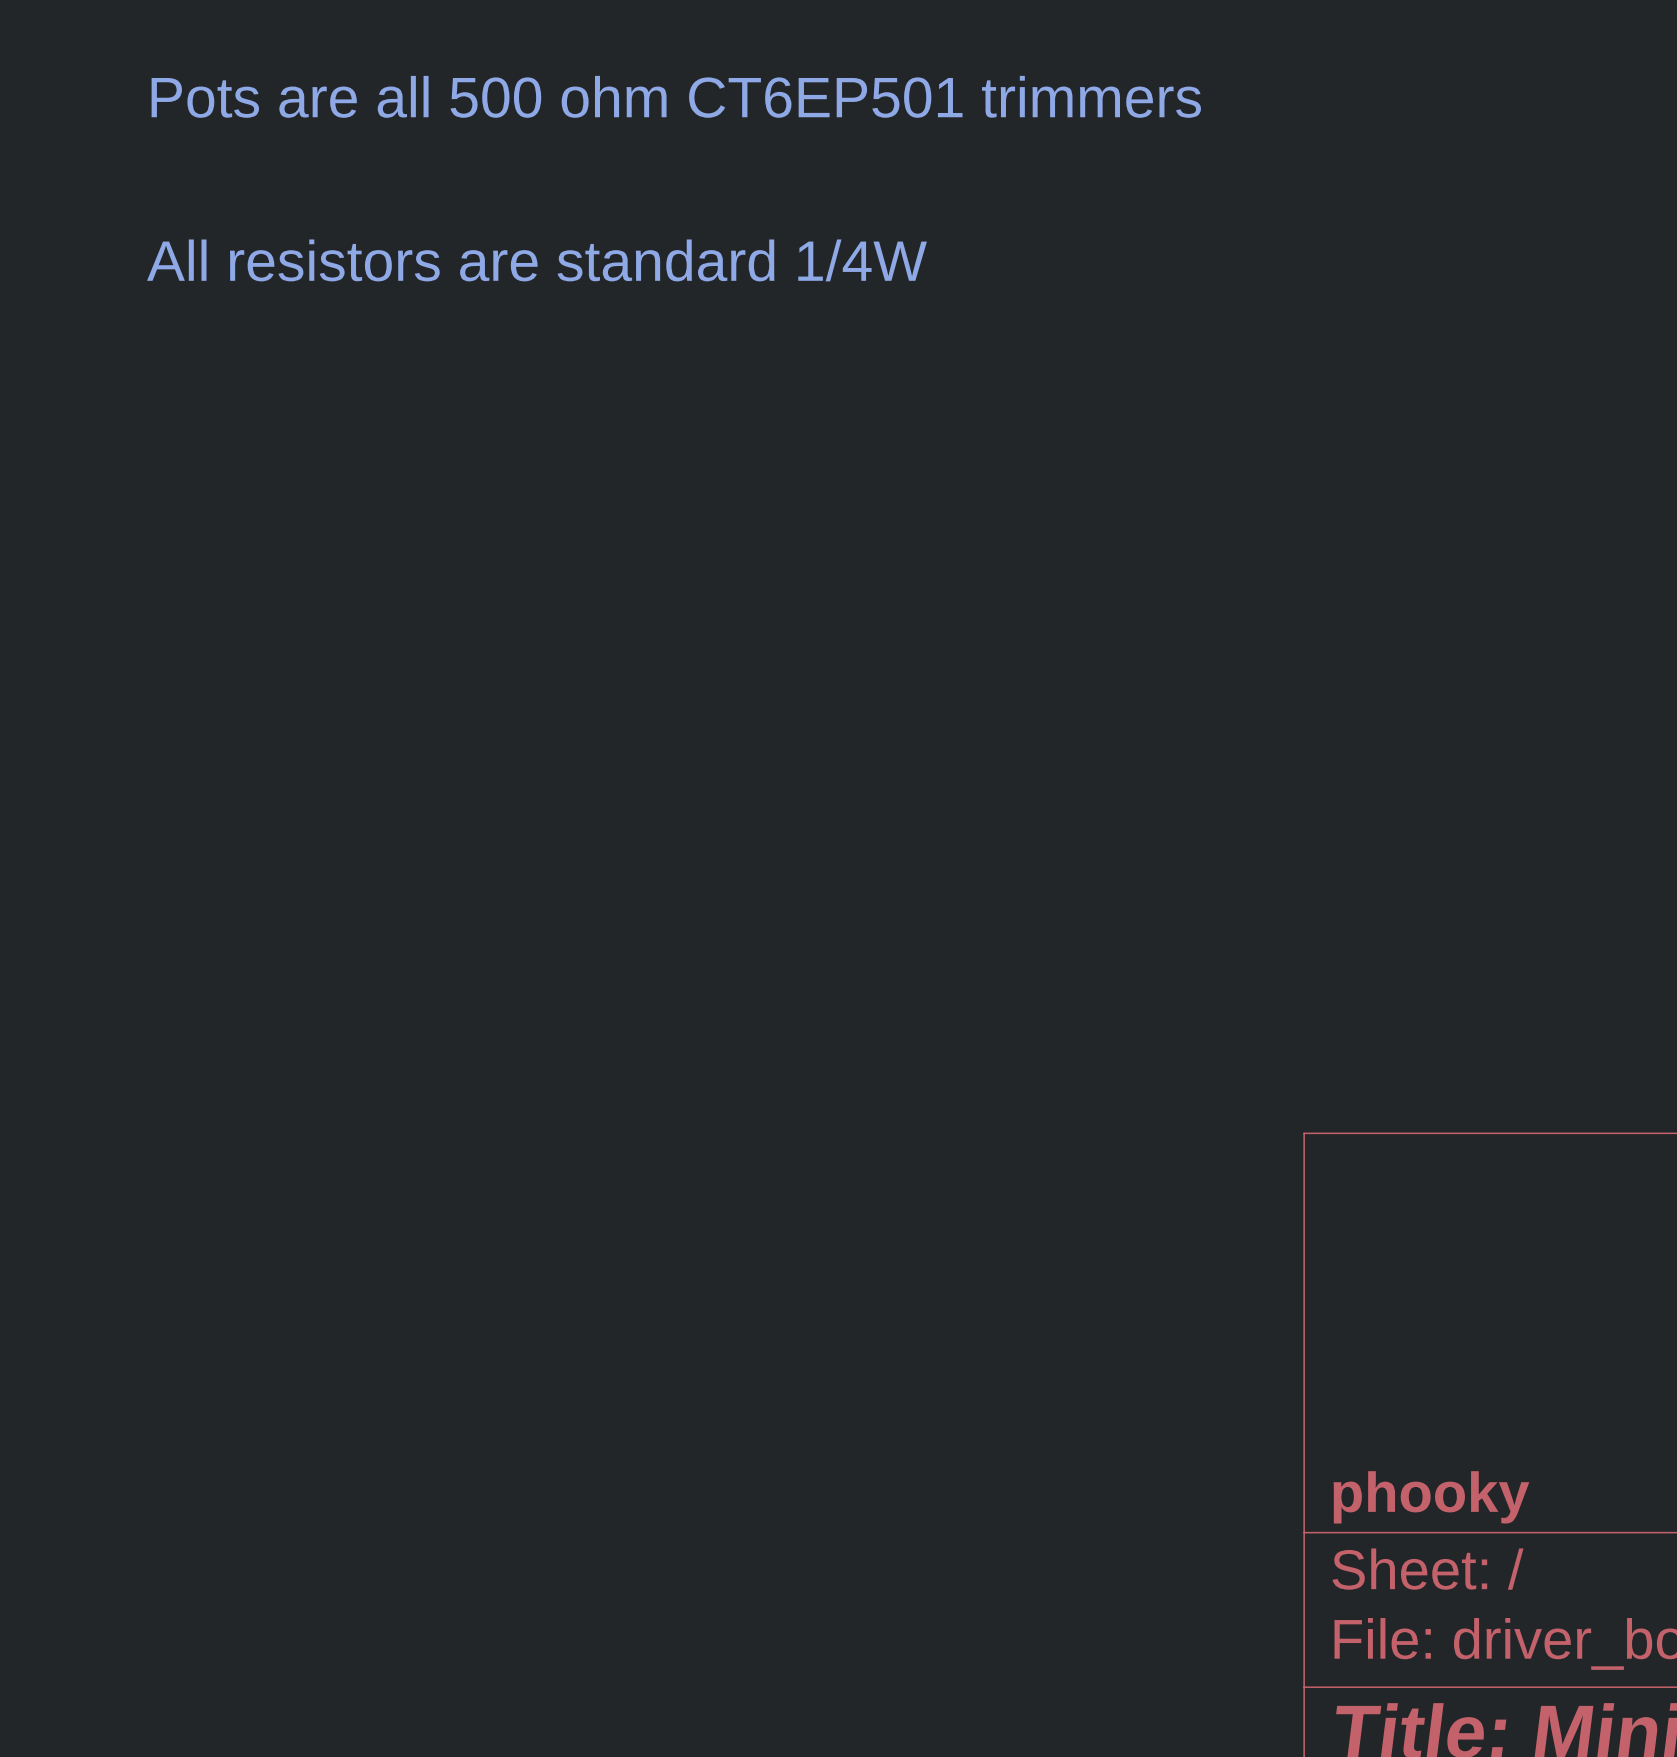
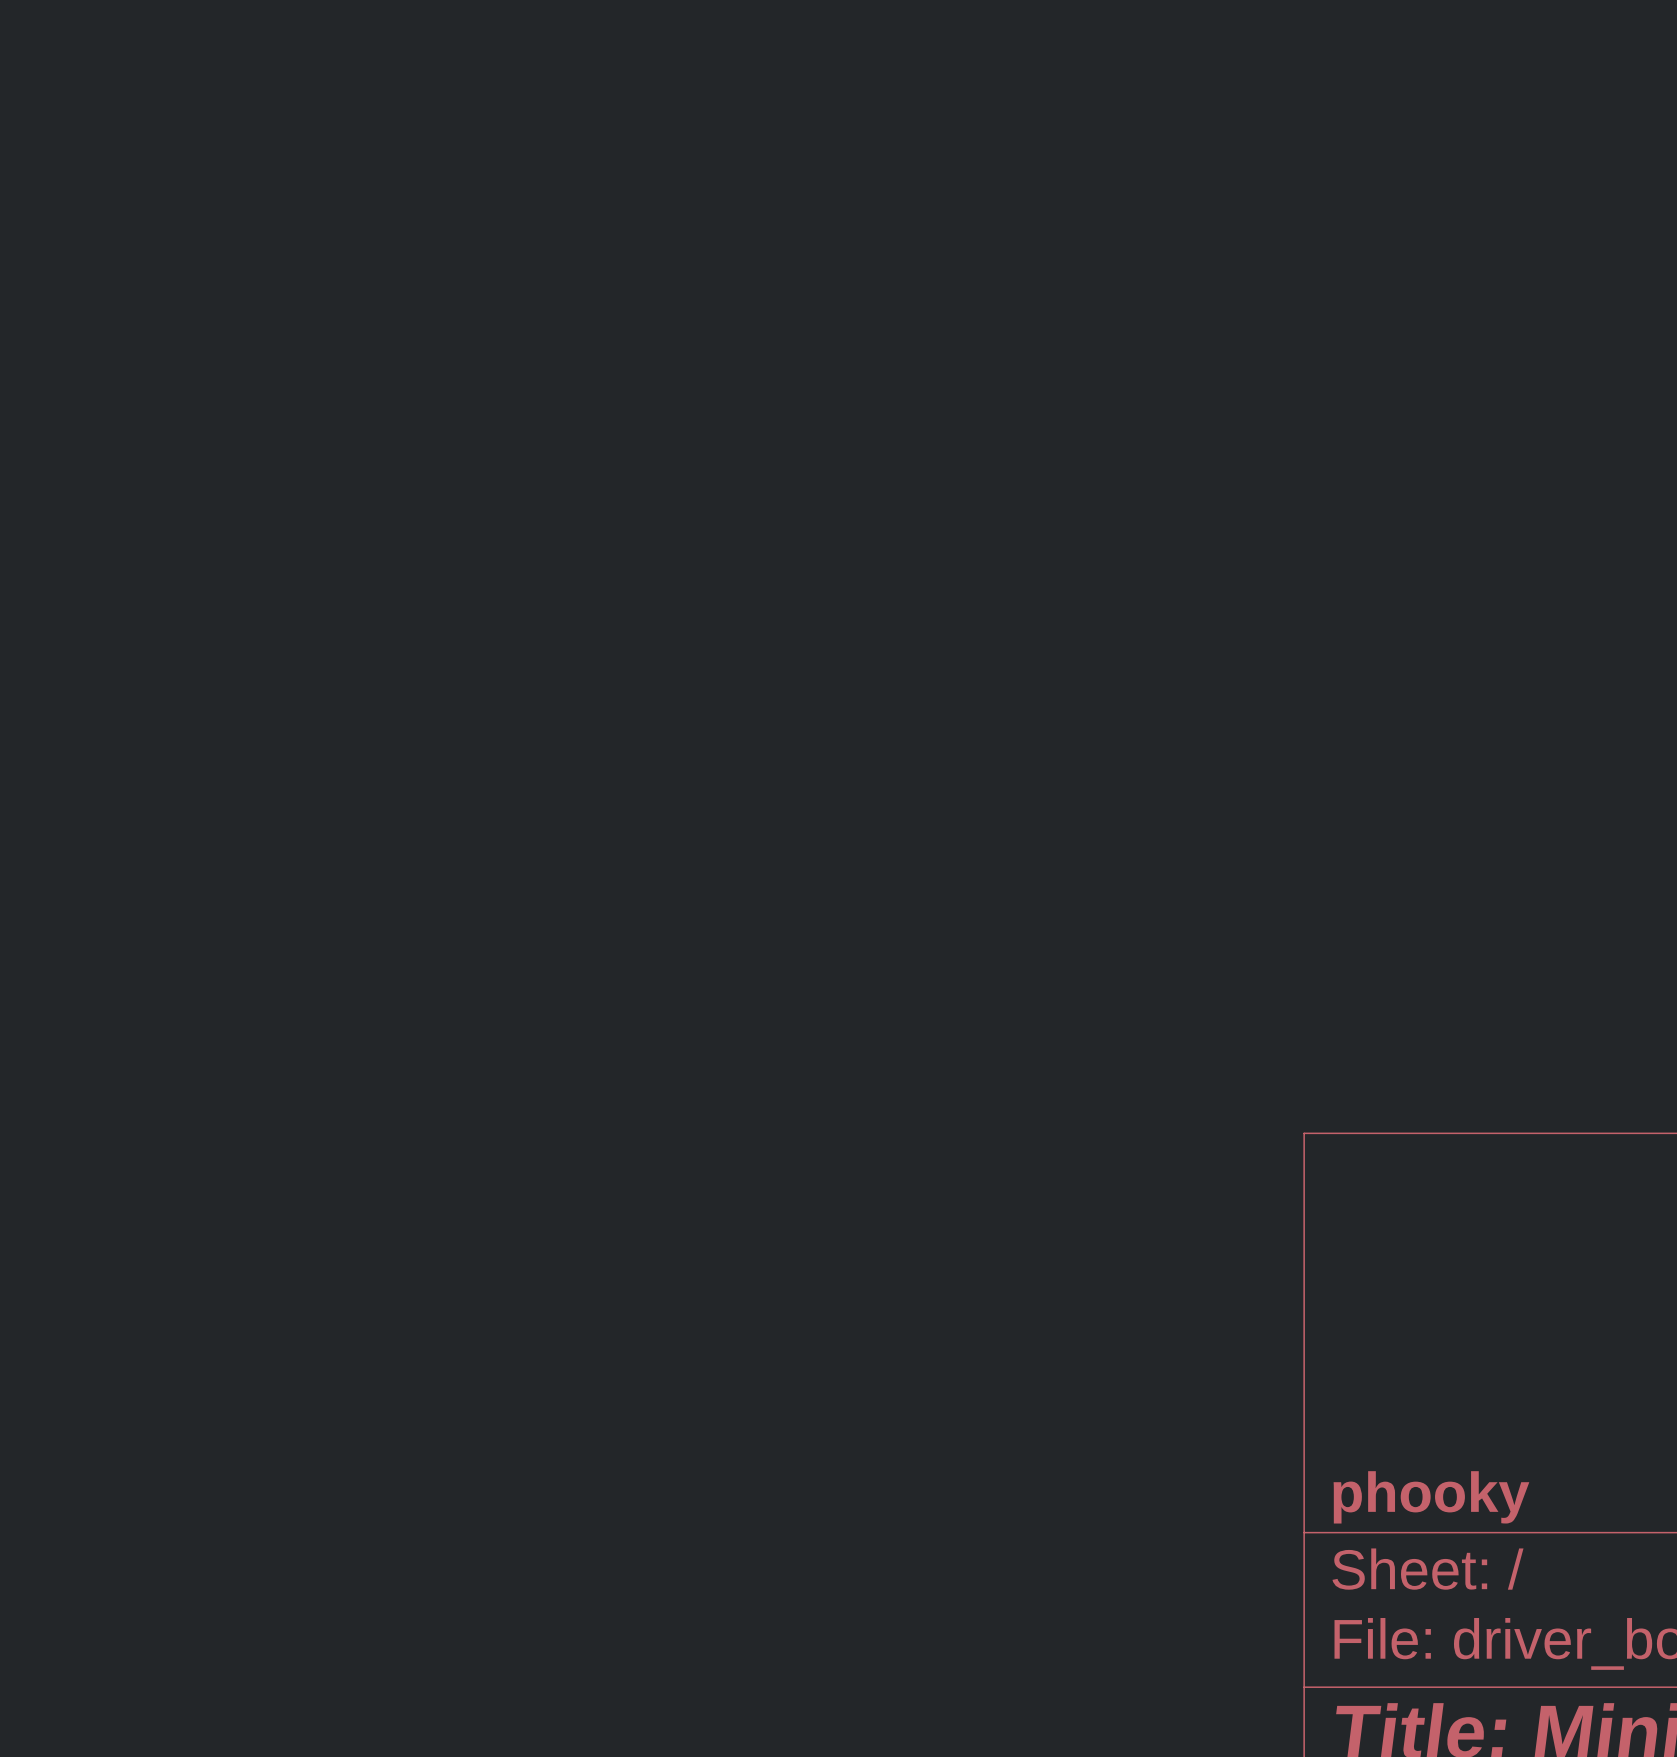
text: Pots are all 500 ohm CT6EP501 trimmers (676, 96) -> none
text: All resistors are standard 1/4W (536, 260) -> none

